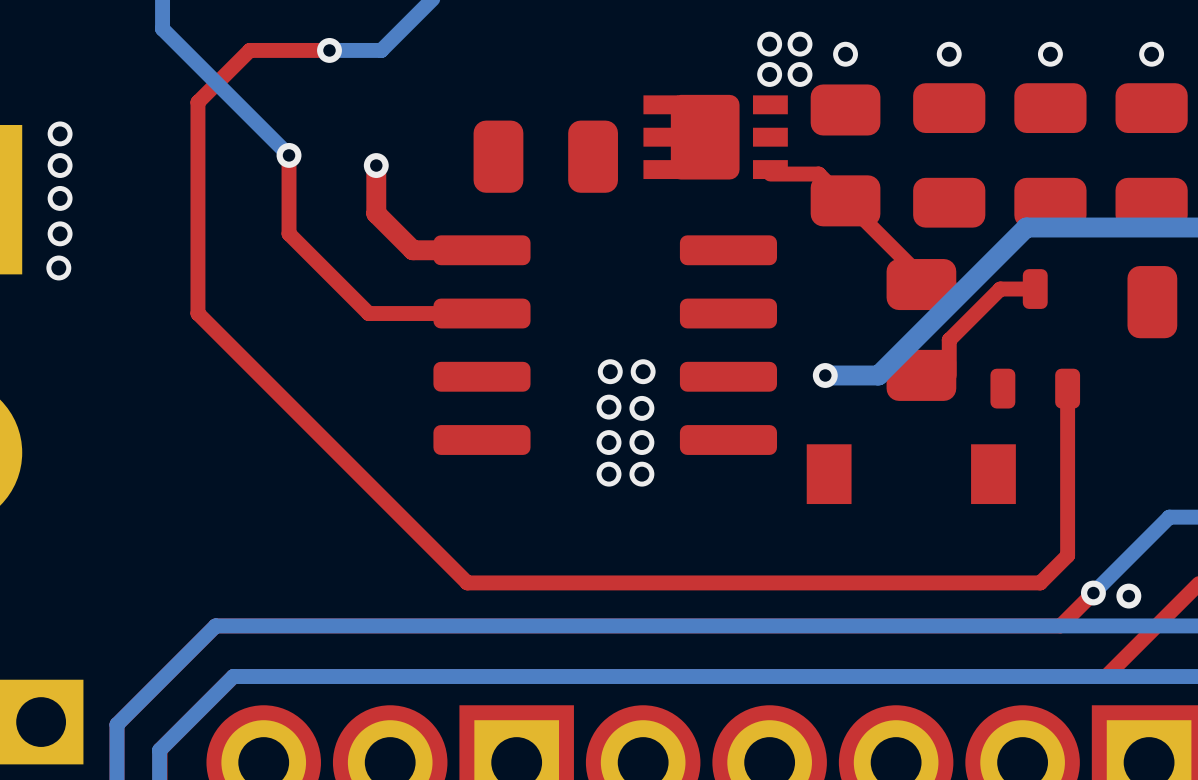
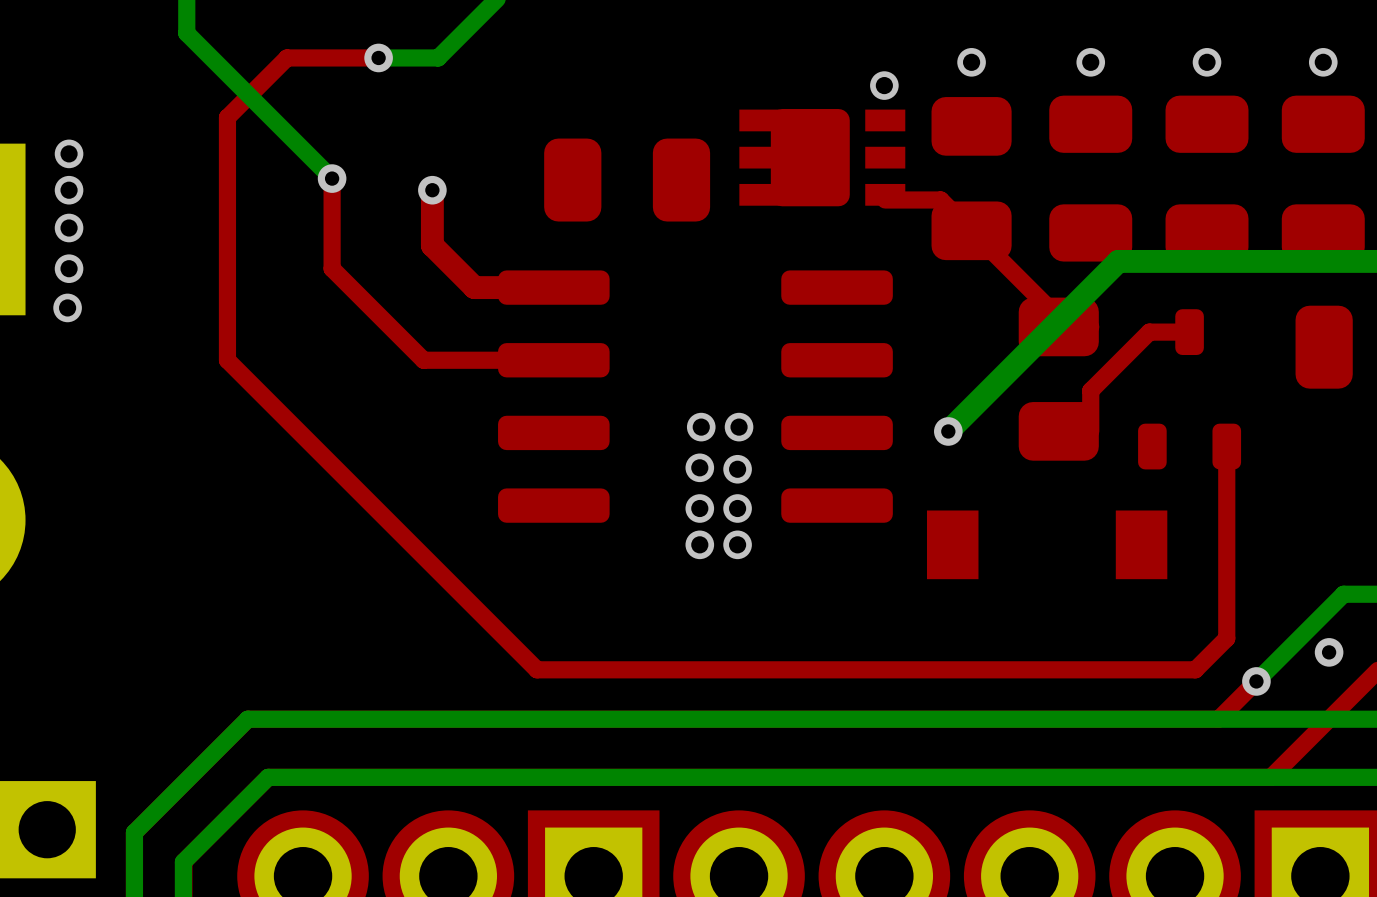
via: (769, 44) -> none
via: (800, 44) -> none
via: (800, 74) -> none
bottom track: (1026, 227) (878, 375) (825, 375) -> (1179, 261) (1118, 261) (948, 431)
via: none -> (1329, 652)
via: (1128, 596) -> none

